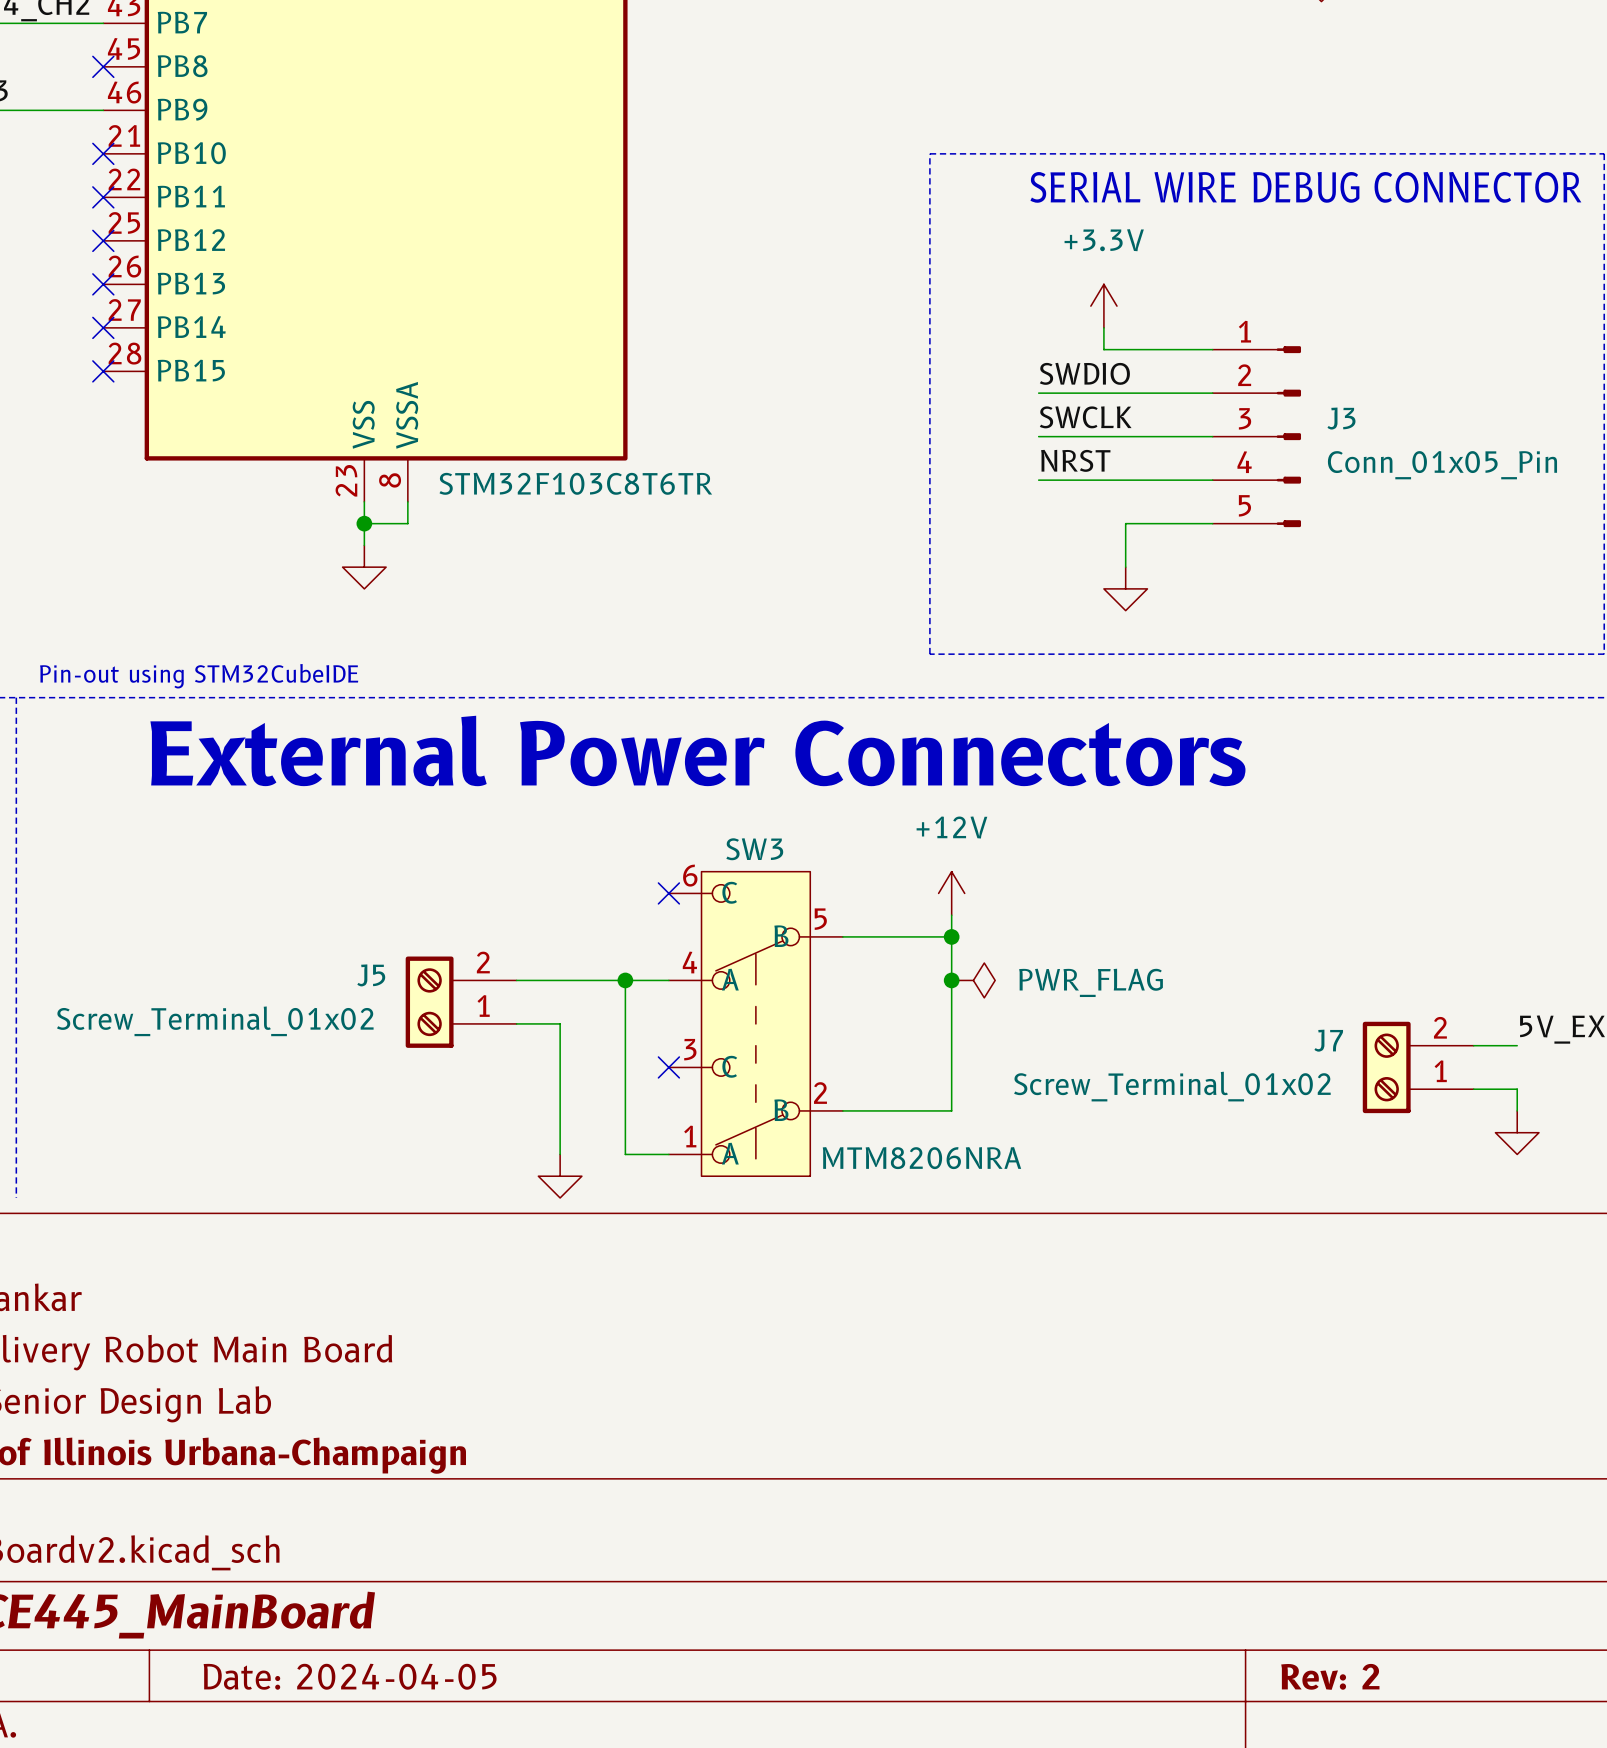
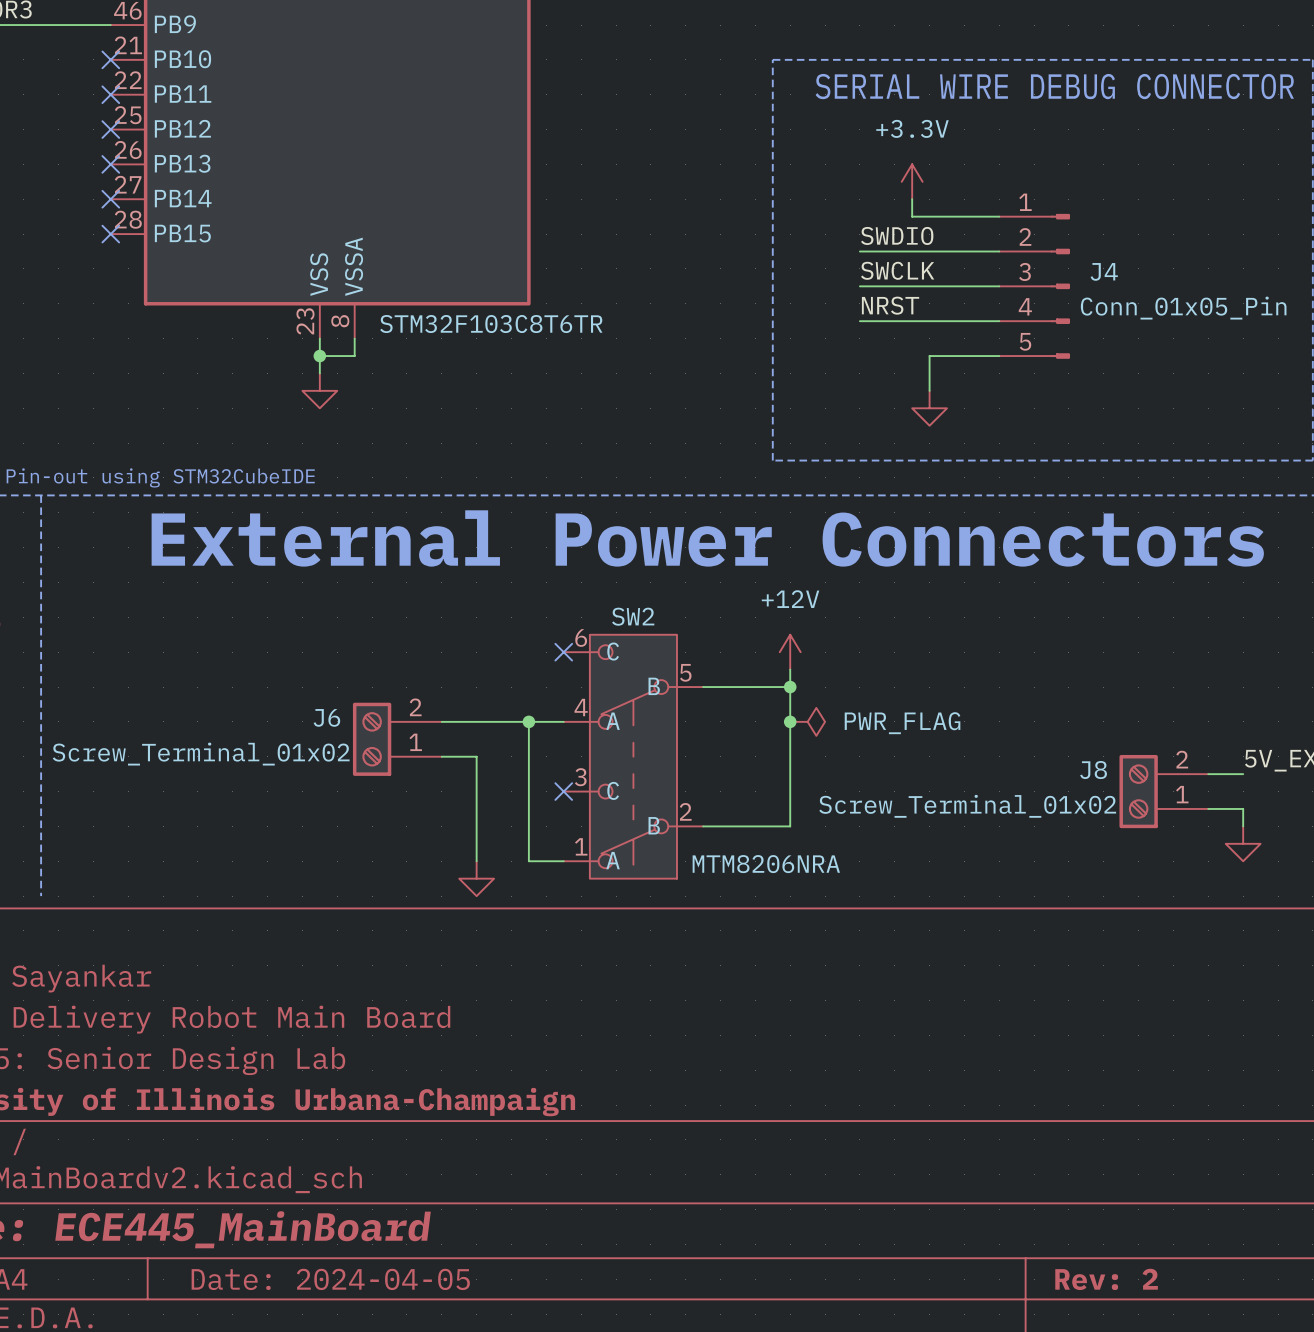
J3 name: J3 (1341, 418) -> J4 (1104, 271)
SW3 name: SW3 (754, 849) -> SW2 (633, 616)
J5 name: J5 (371, 975) -> J6 (326, 717)
J7 name: J7 (1328, 1040) -> J8 (1093, 770)

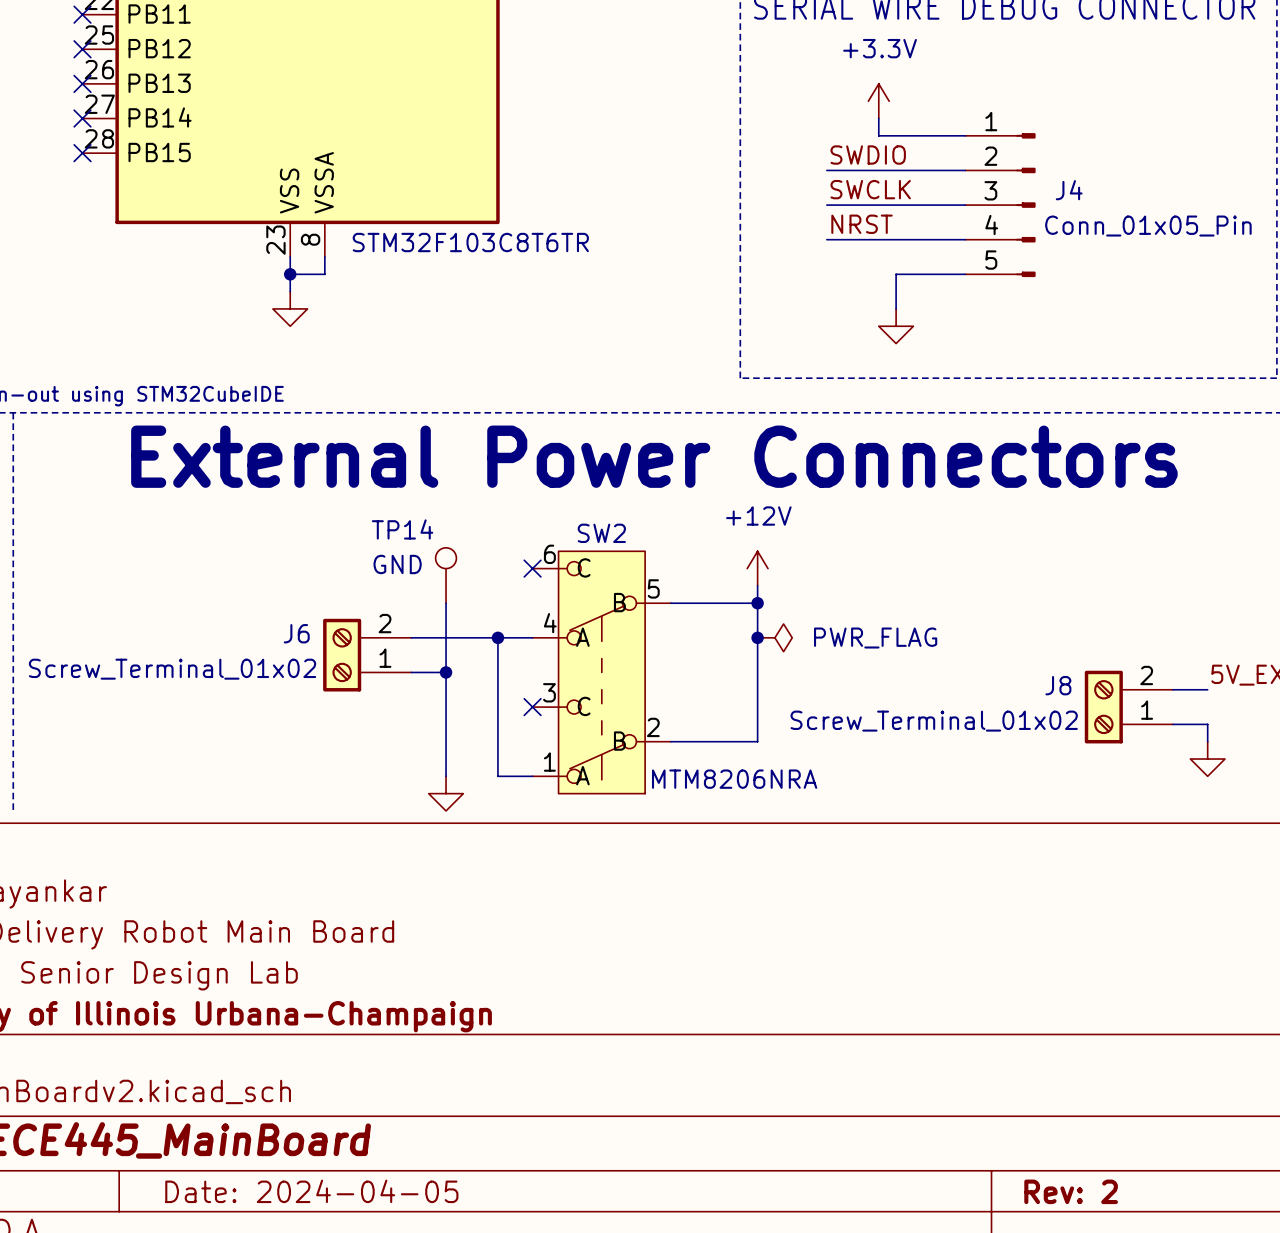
TP14: none -> GND (446, 575)
wire: none -> (446, 603) (446, 672)
junction: none -> (446, 672)

